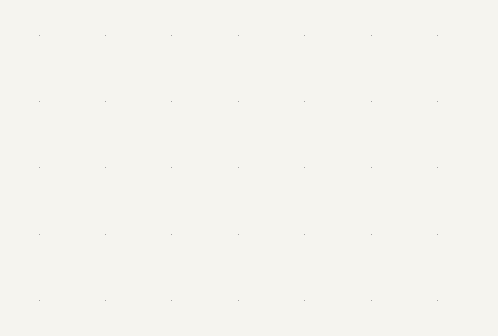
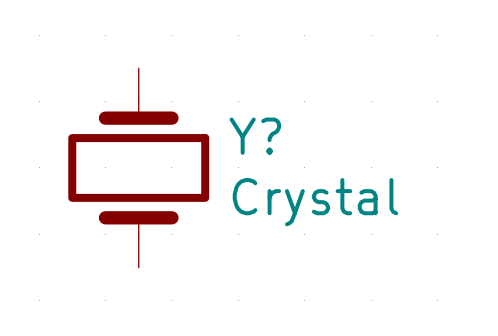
Y?: none -> Crystal (138, 167)

